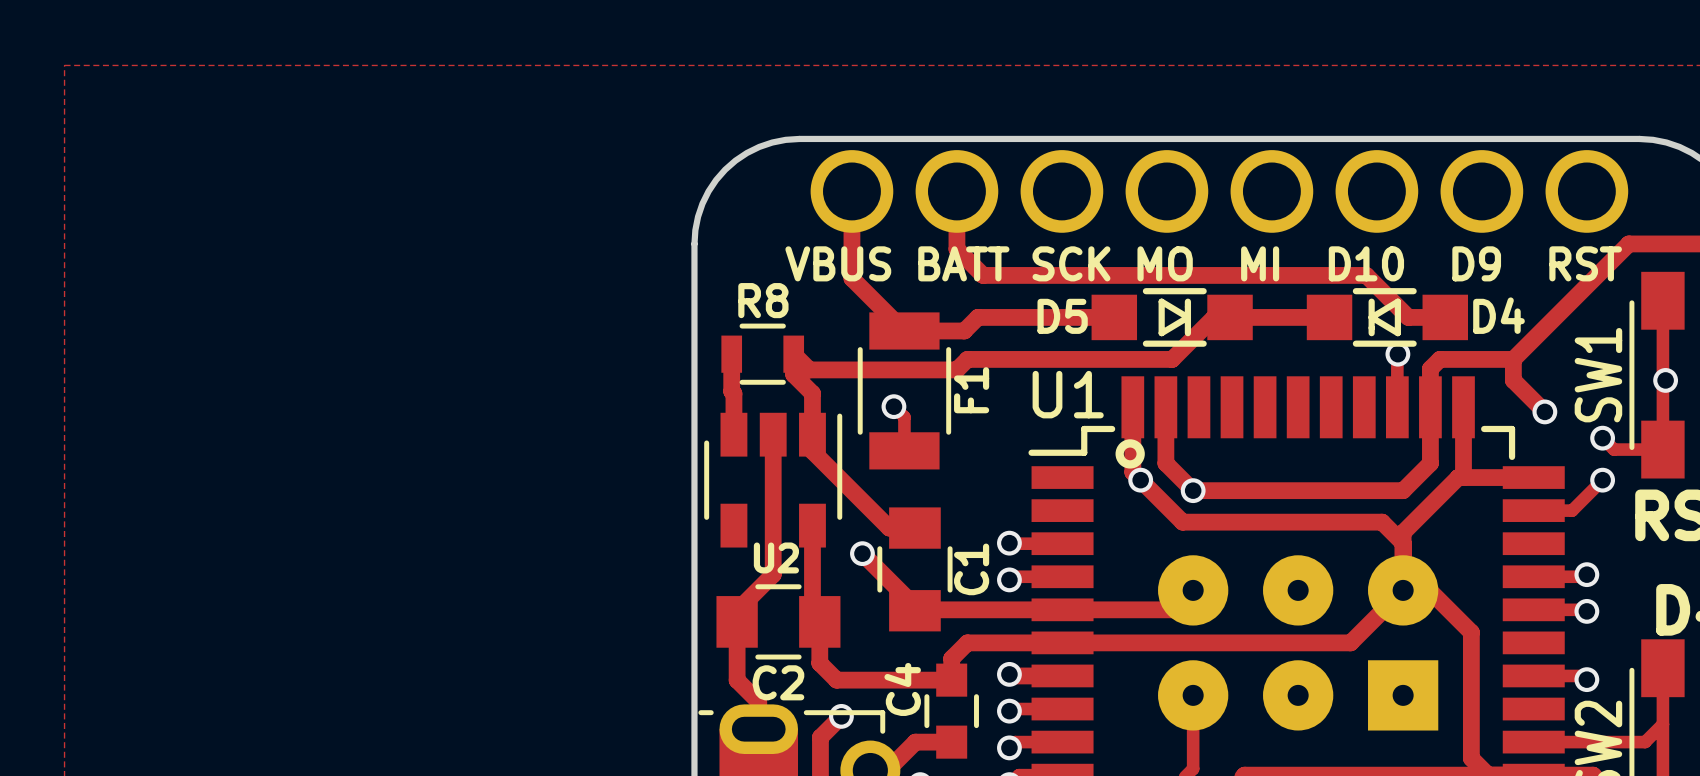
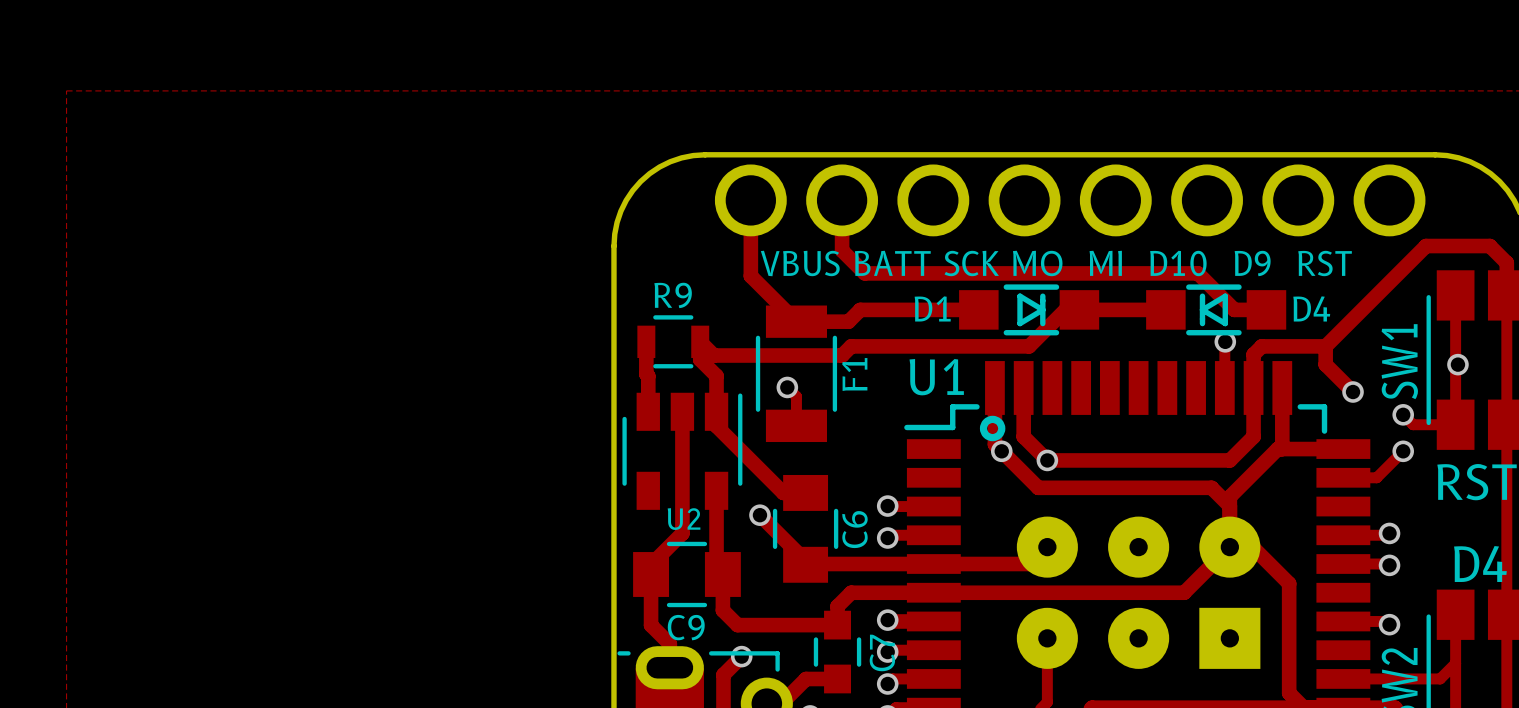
R8 name: R8 (763, 300) -> R9 (673, 295)
D5 name: D5 (1062, 316) -> D1 (932, 308)
C1 name: C1 (971, 569) -> C6 (854, 529)
C2 name: C2 (778, 682) -> C9 (686, 627)
C4 name: C4 (902, 689) -> C7 (882, 652)

